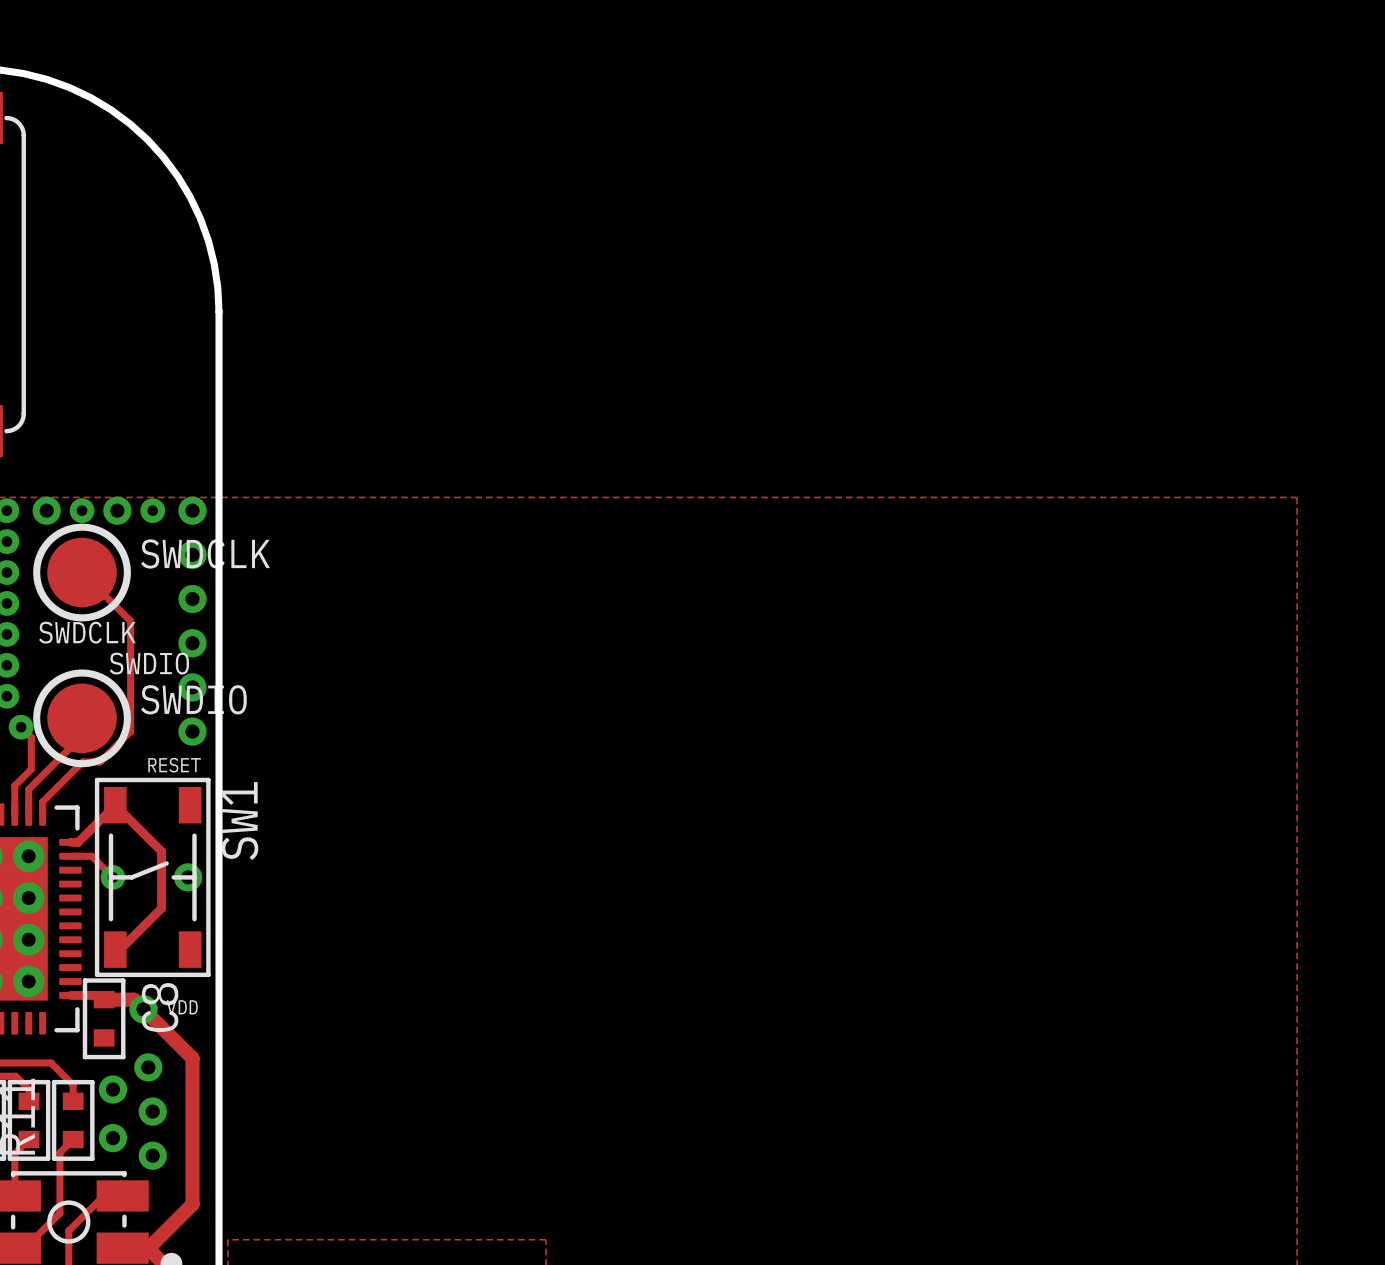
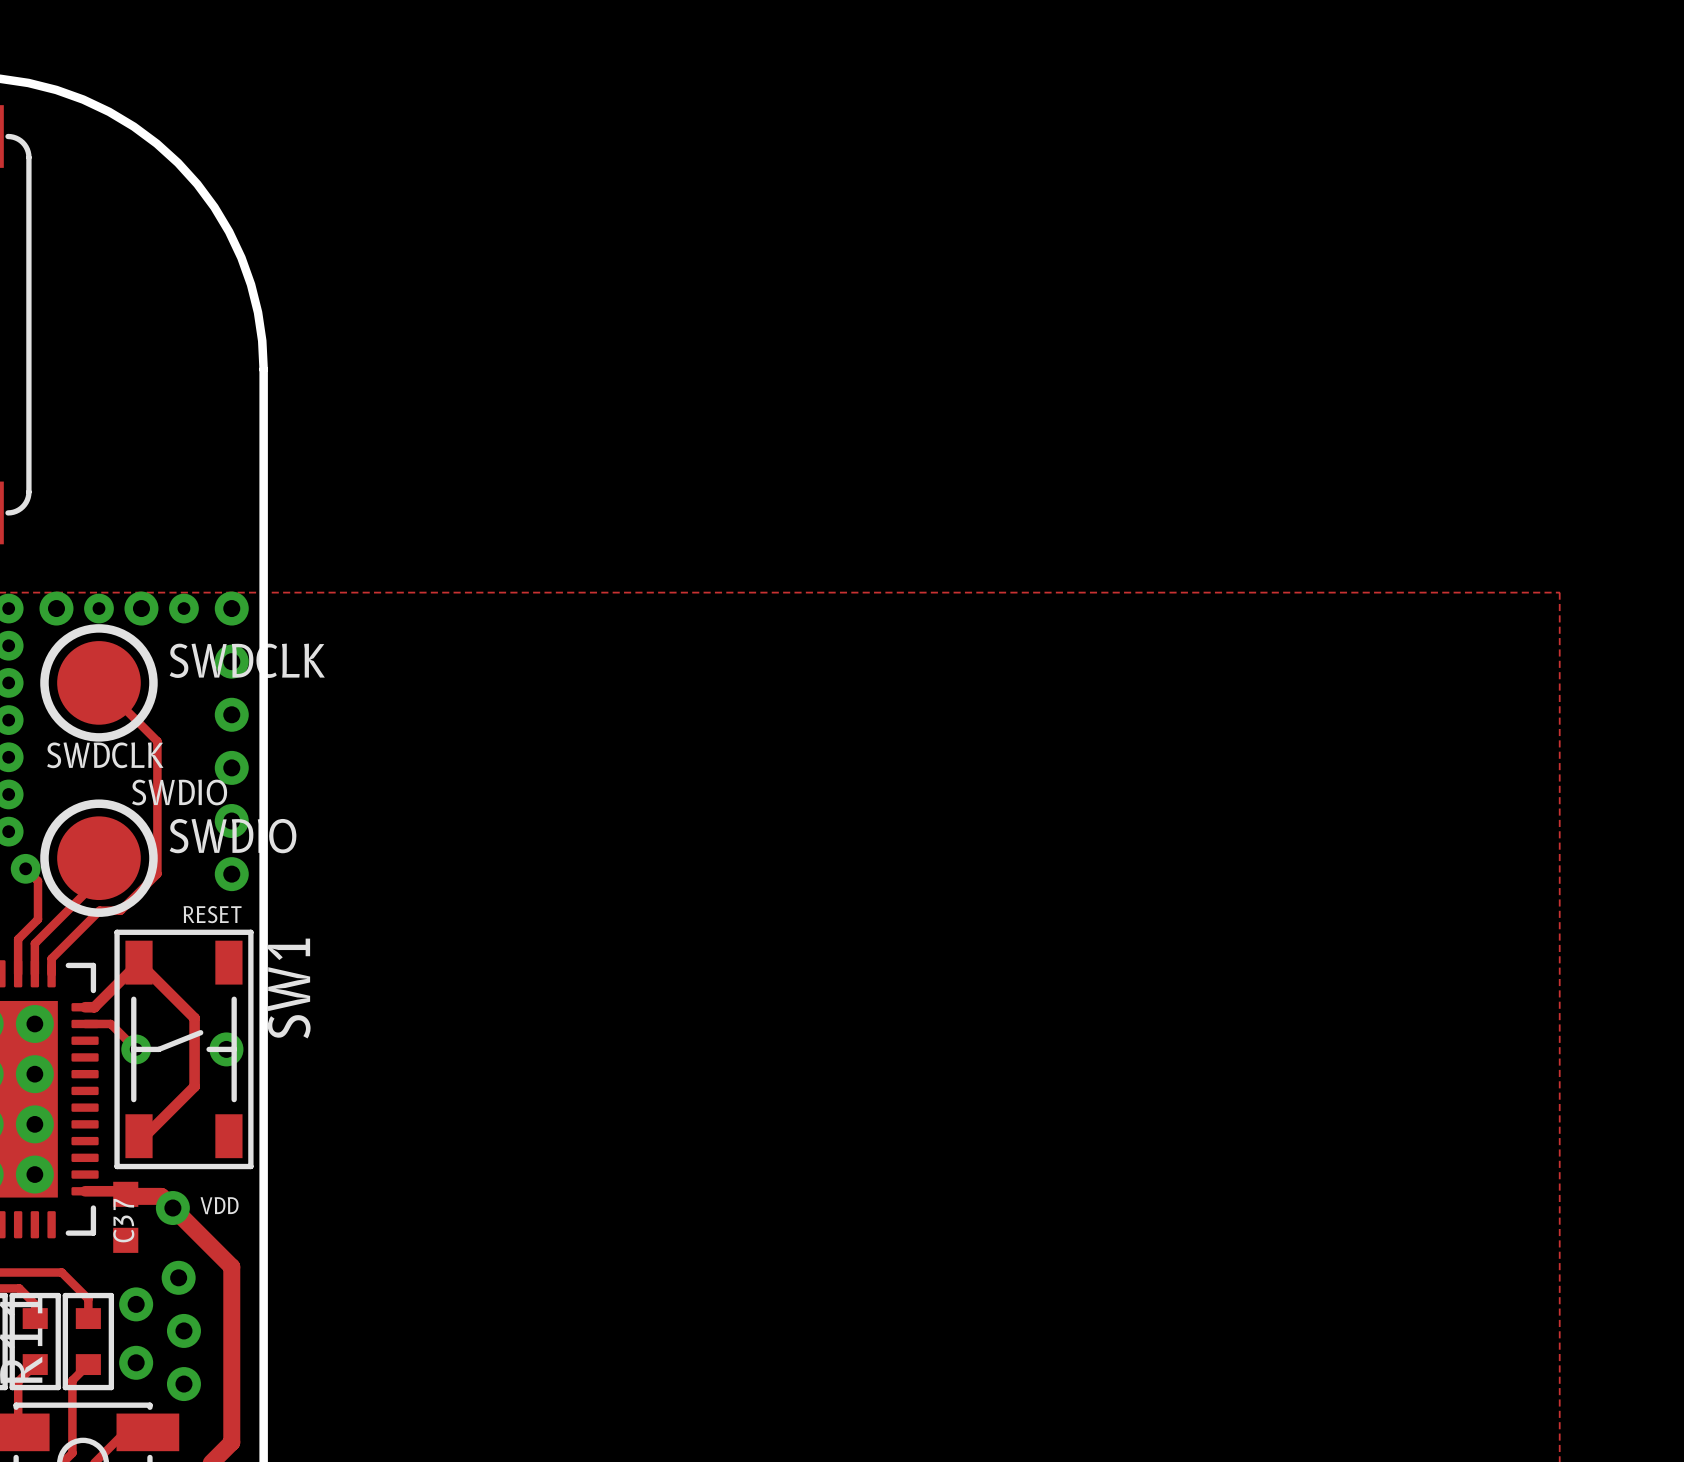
C37: none -> (125, 1217)
C8: (104, 1018) -> none

